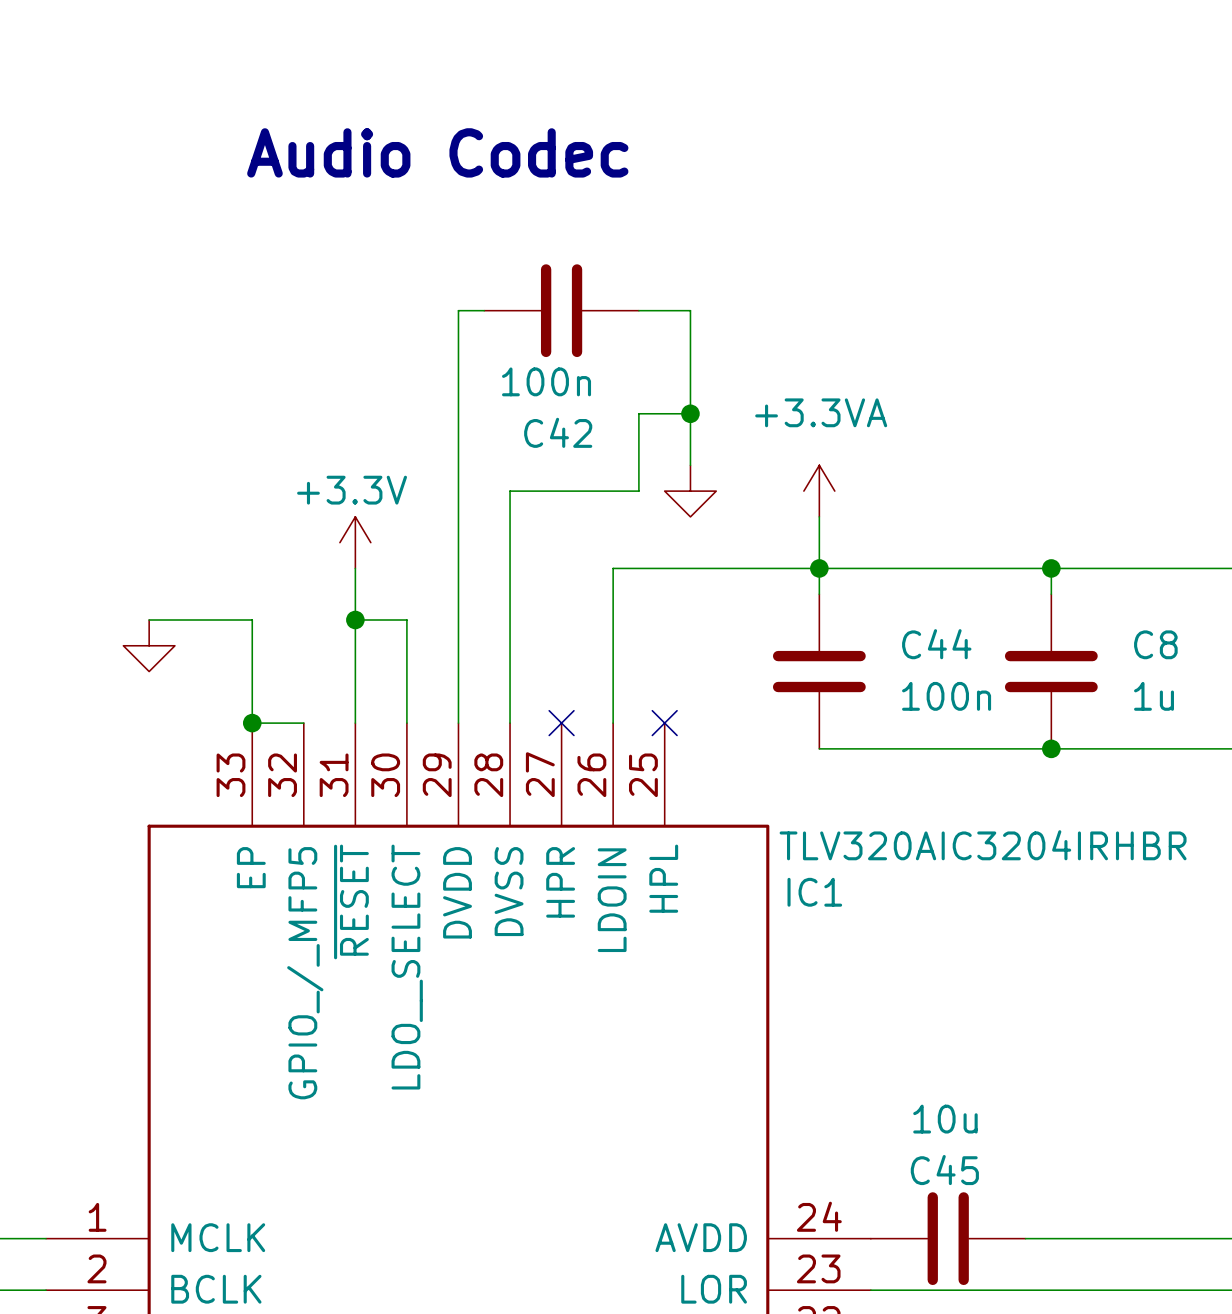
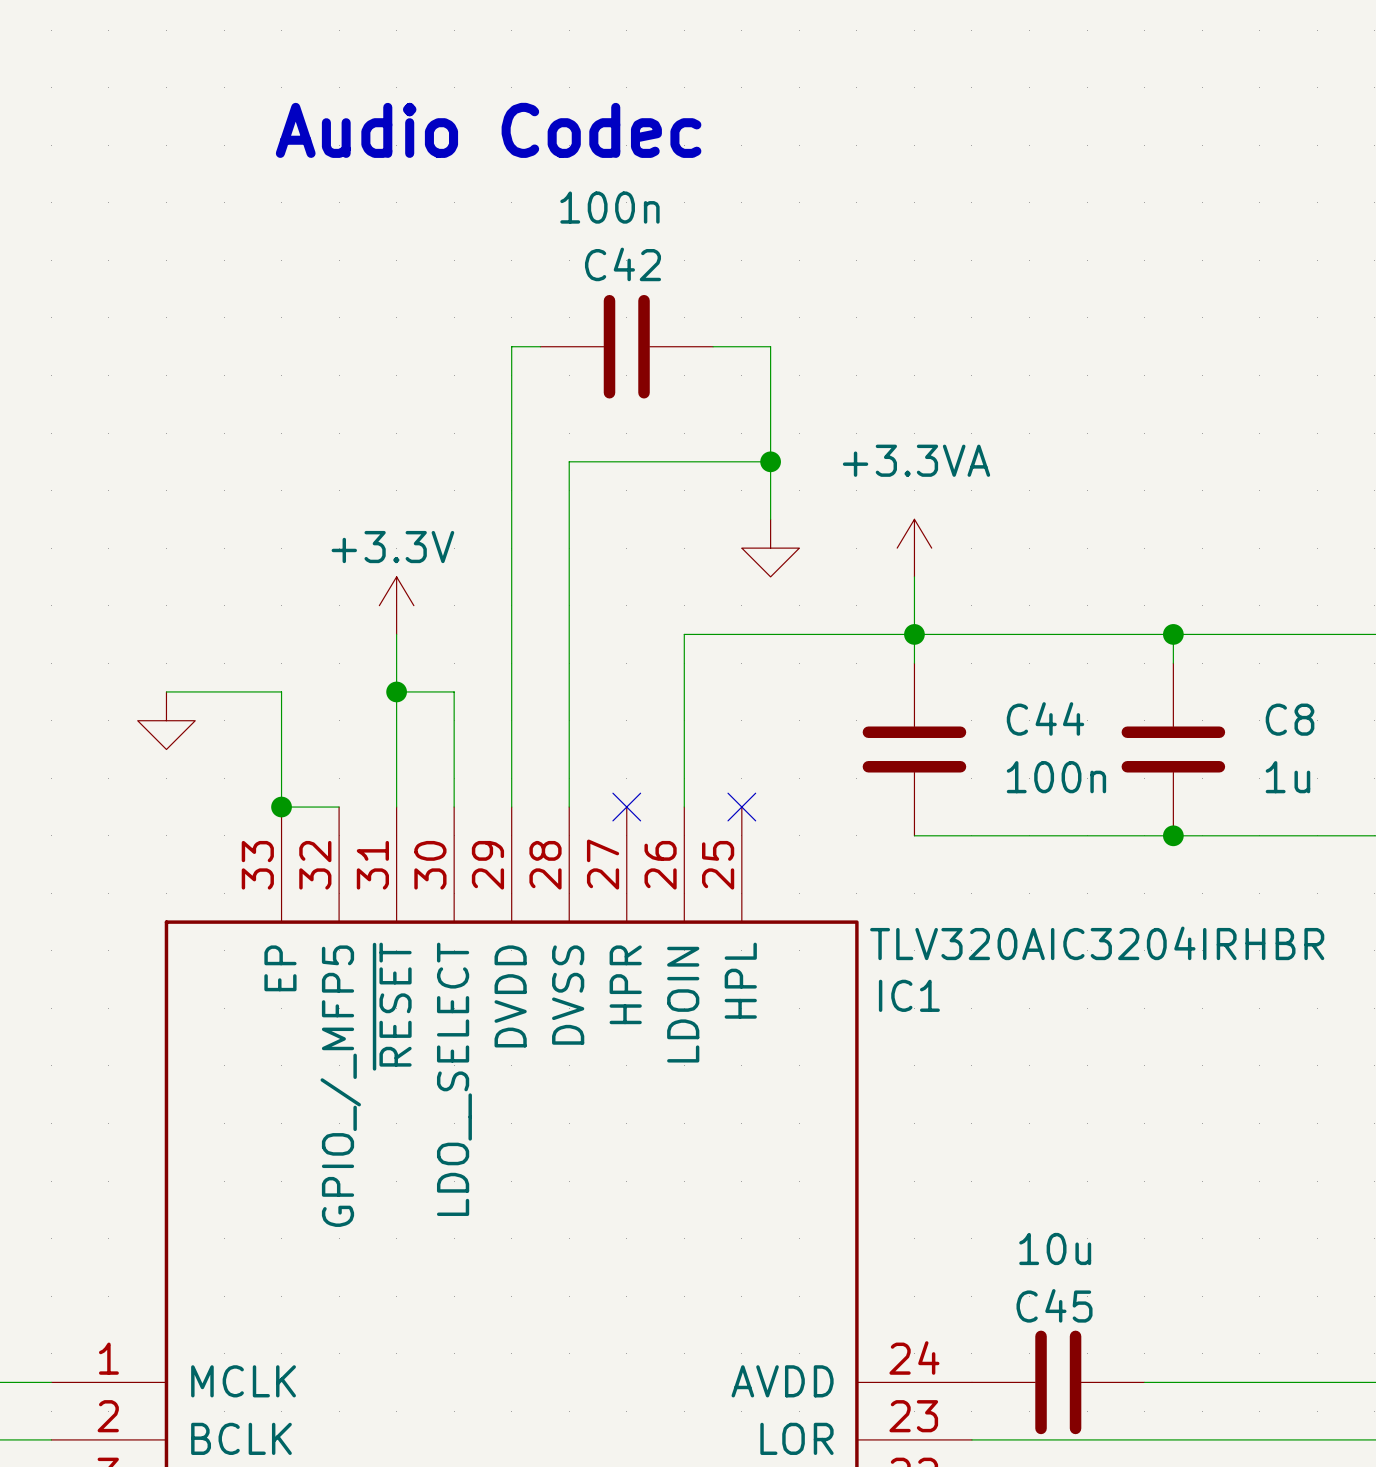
text position: Audio Codec (437, 152) -> Audio Codec (488, 130)
C42 value position: 100n (546, 381) -> 100n (609, 207)
wire: (638, 413) (638, 491) (510, 491) -> (713, 461) (569, 461) (569, 548)
C42 name position: C42 (558, 432) -> C42 (622, 264)

